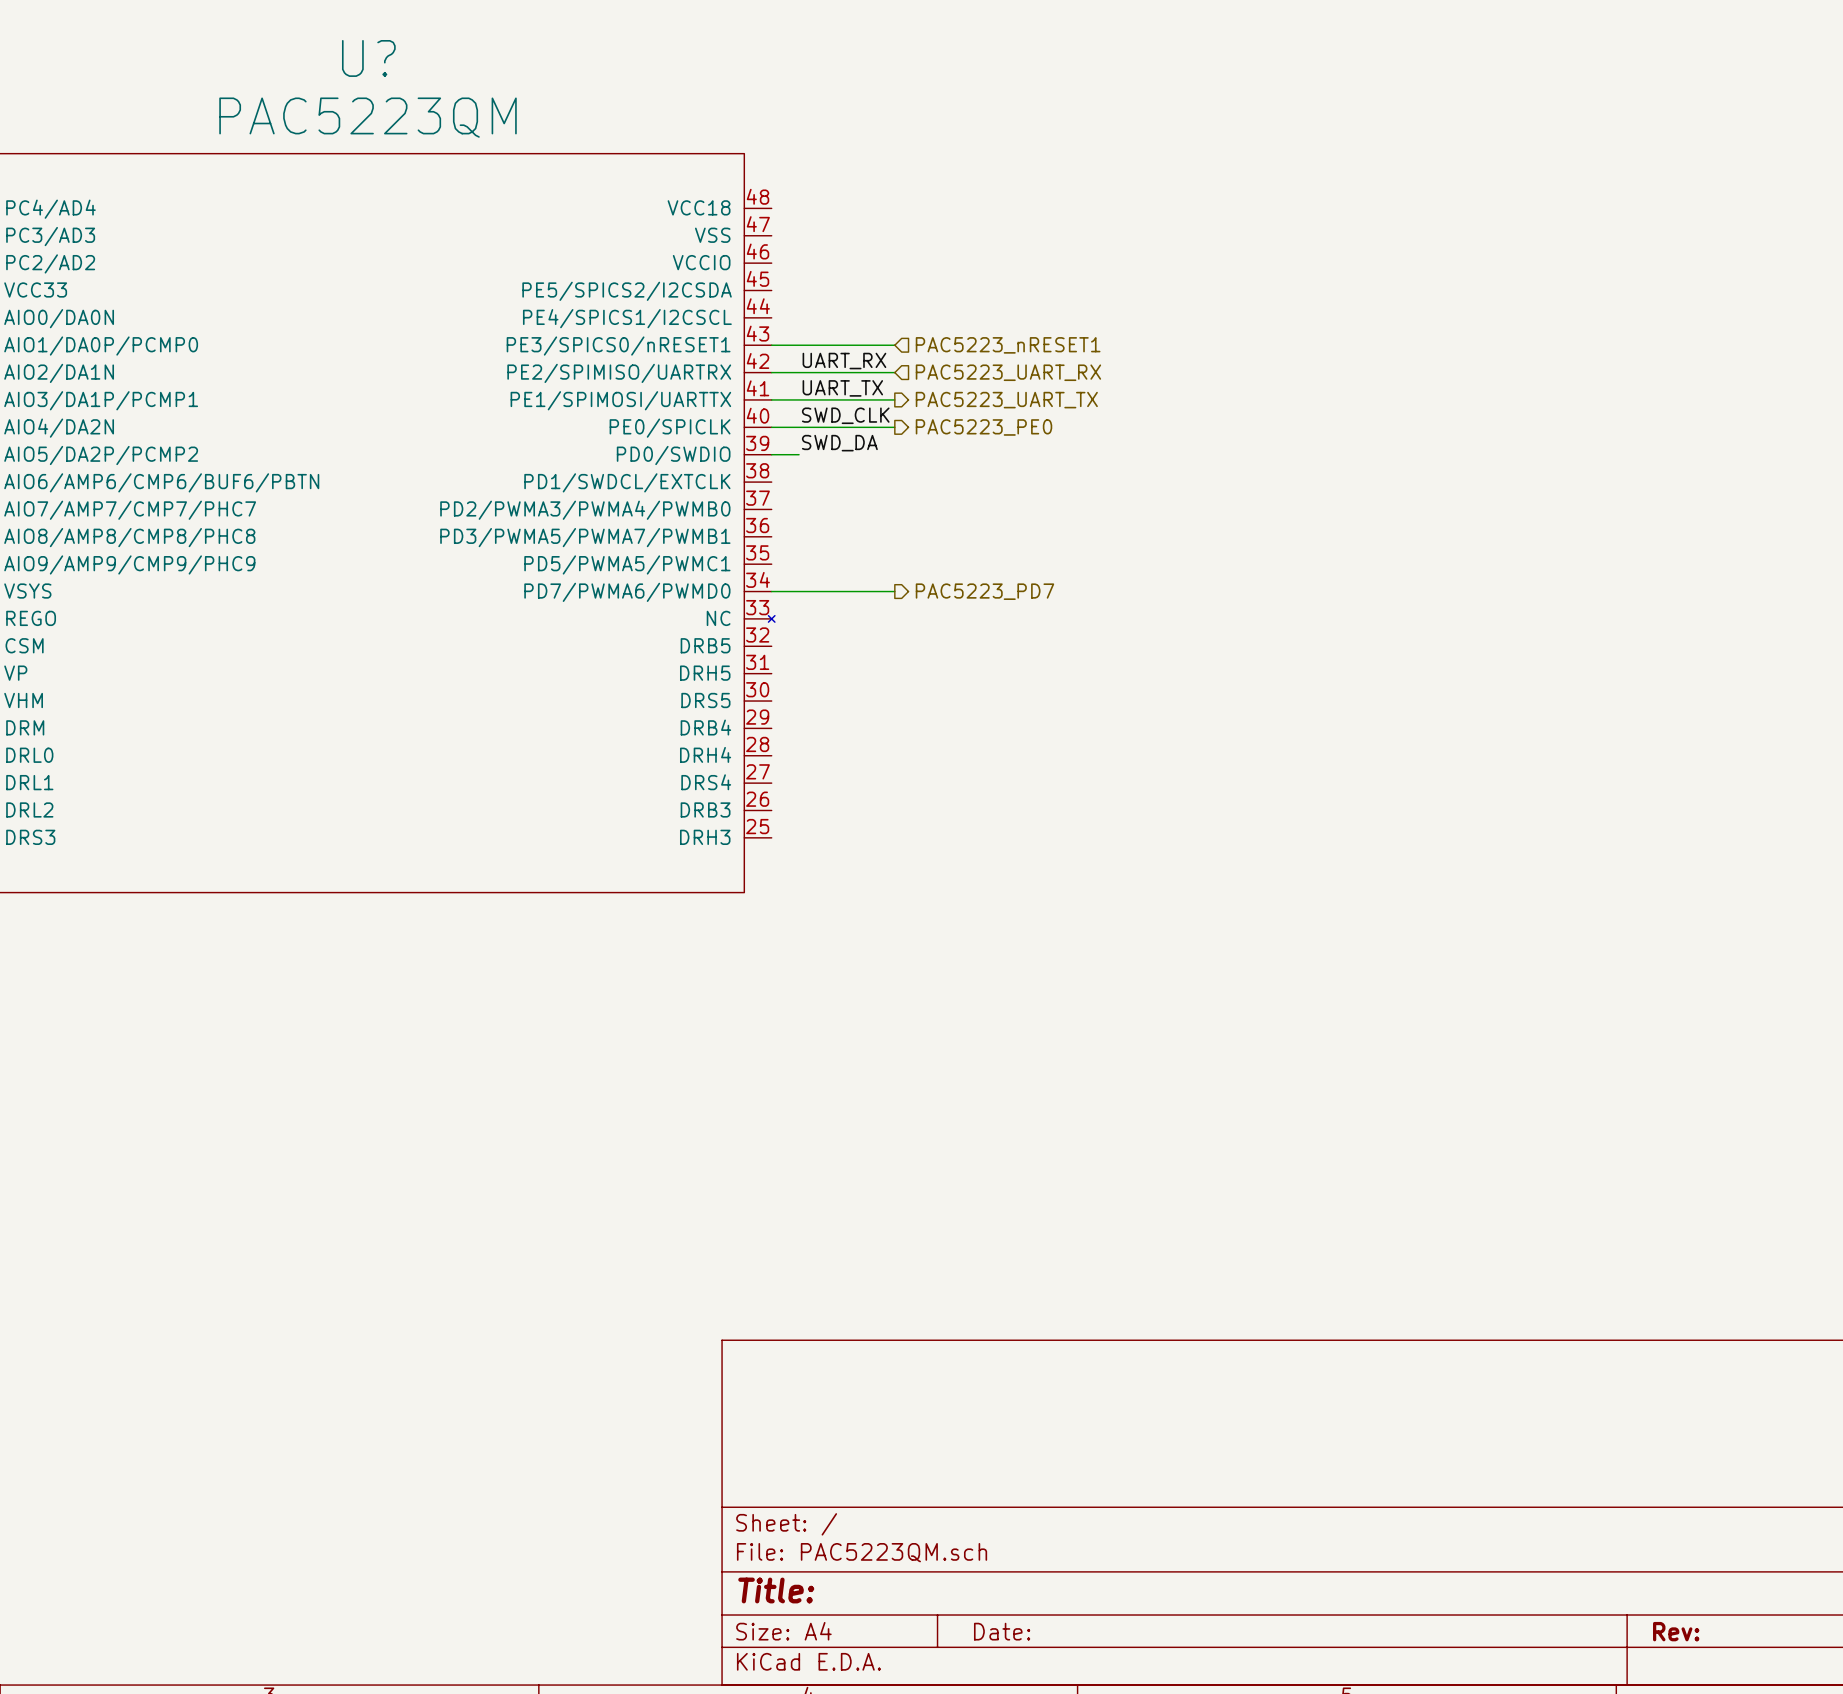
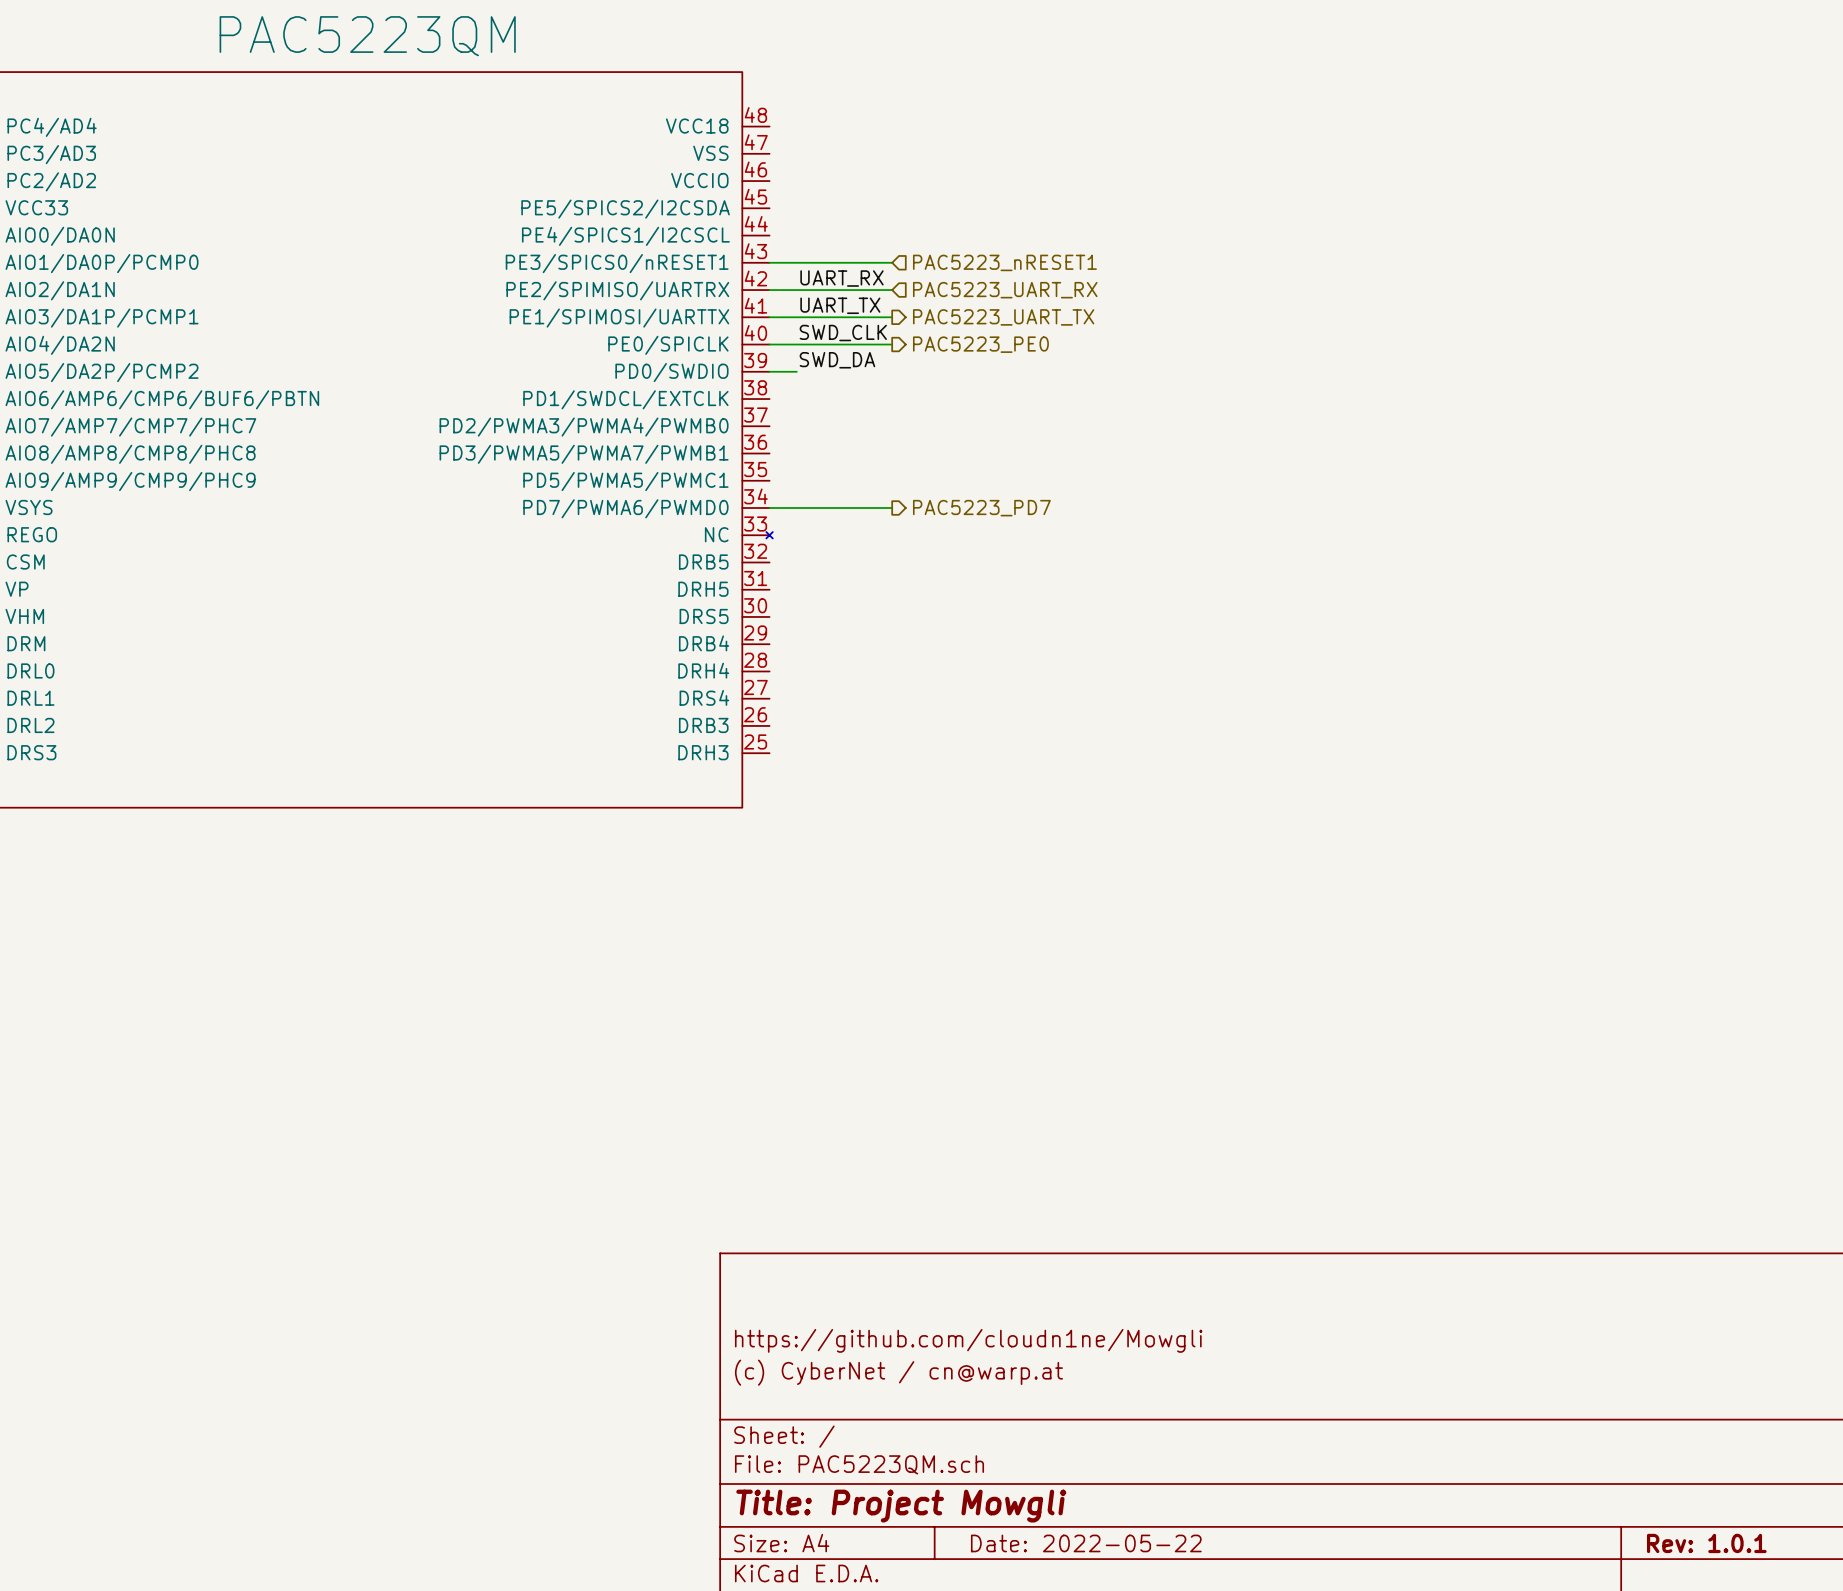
title block: none -> https://github.com/cloudn1ne/Mowgli (968, 1340)
title block: none -> (c) CyberNet / cn@warp.at (898, 1372)
title block: Title: (776, 1590) -> Title: Project Mowgli (901, 1506)
title block: Date: (1002, 1631) -> Date: 2022-05-22 (1086, 1543)
title block: Rev: (1676, 1631) -> Rev: 1.0.1 (1706, 1543)

